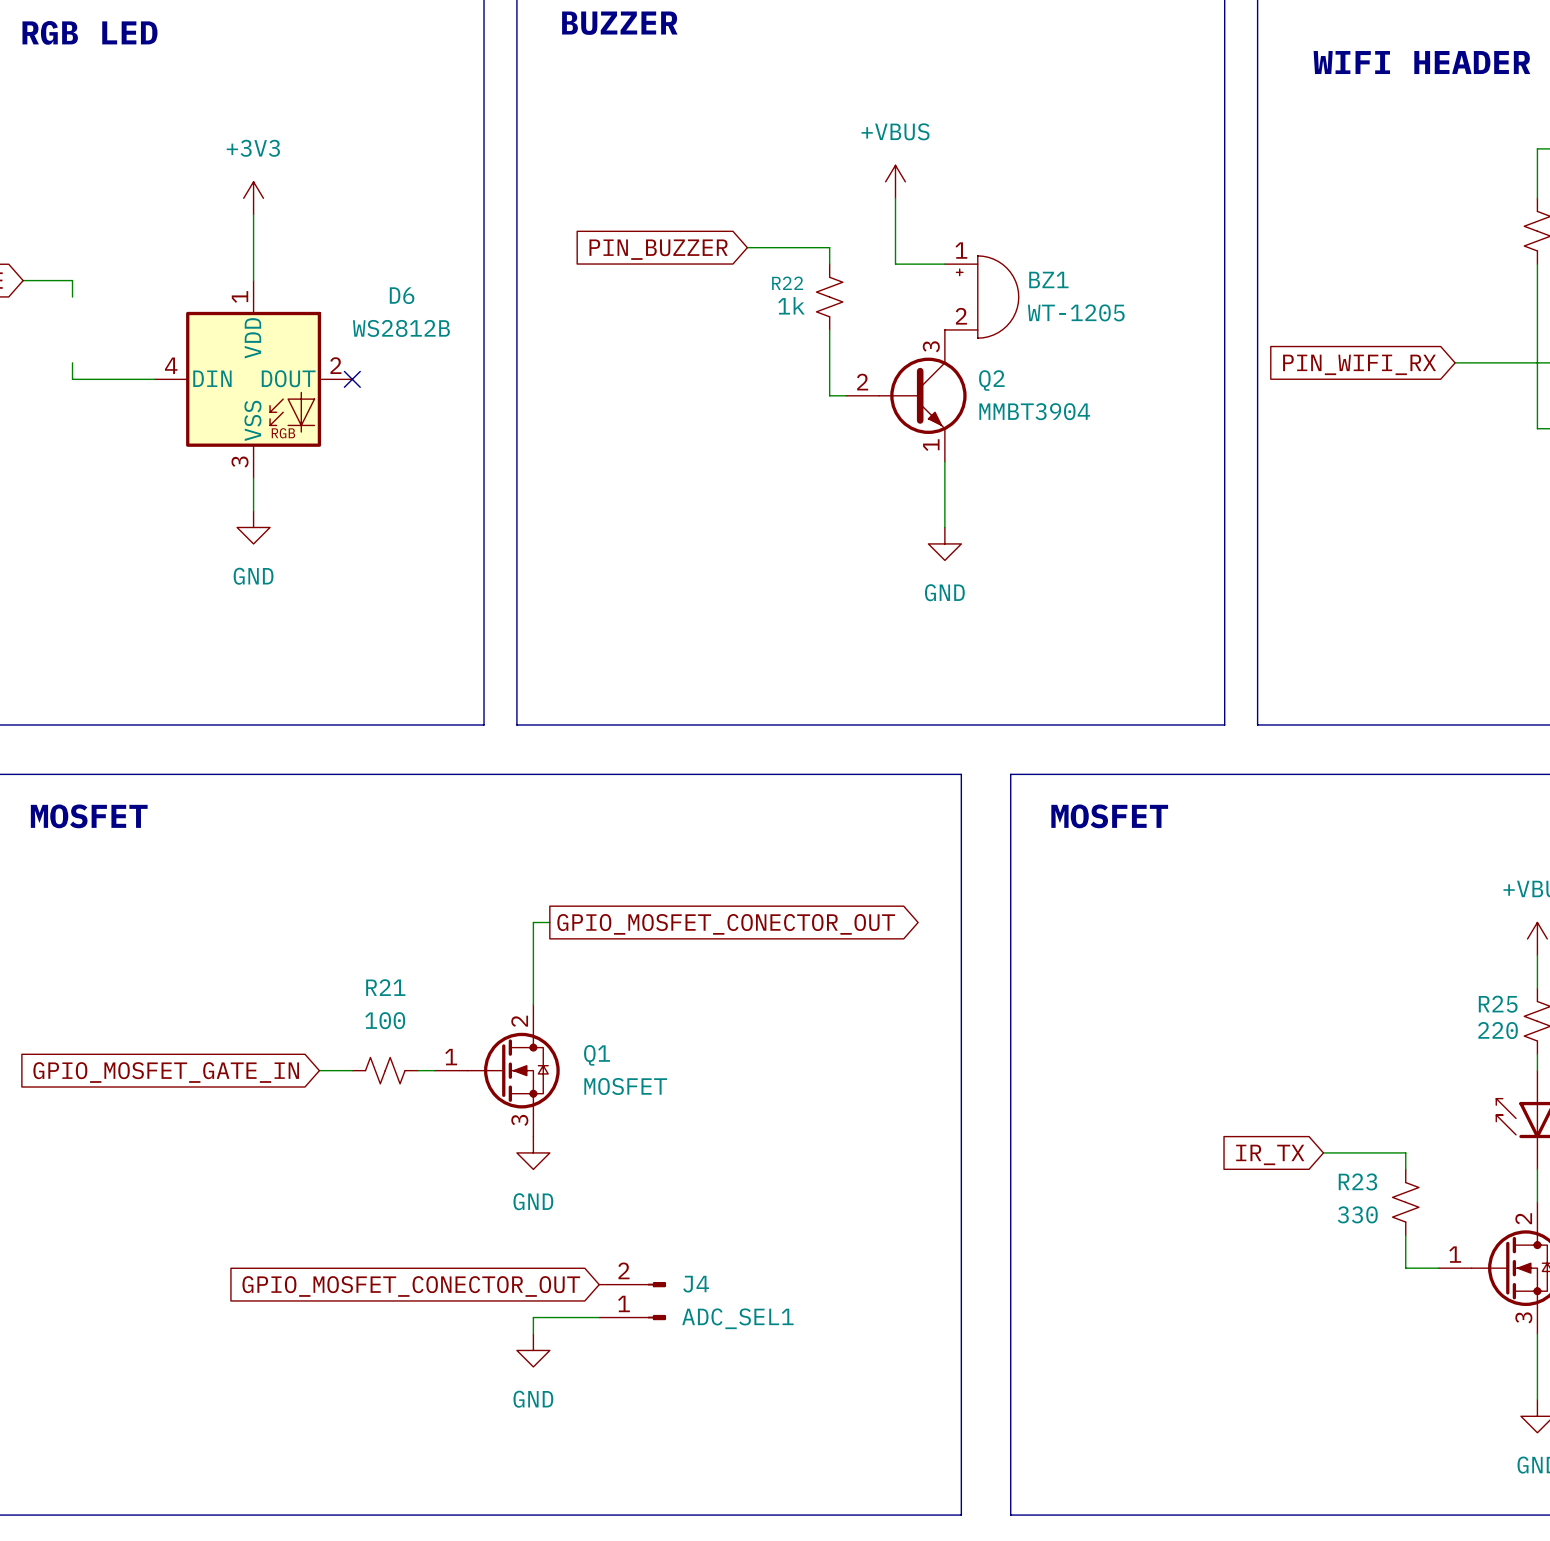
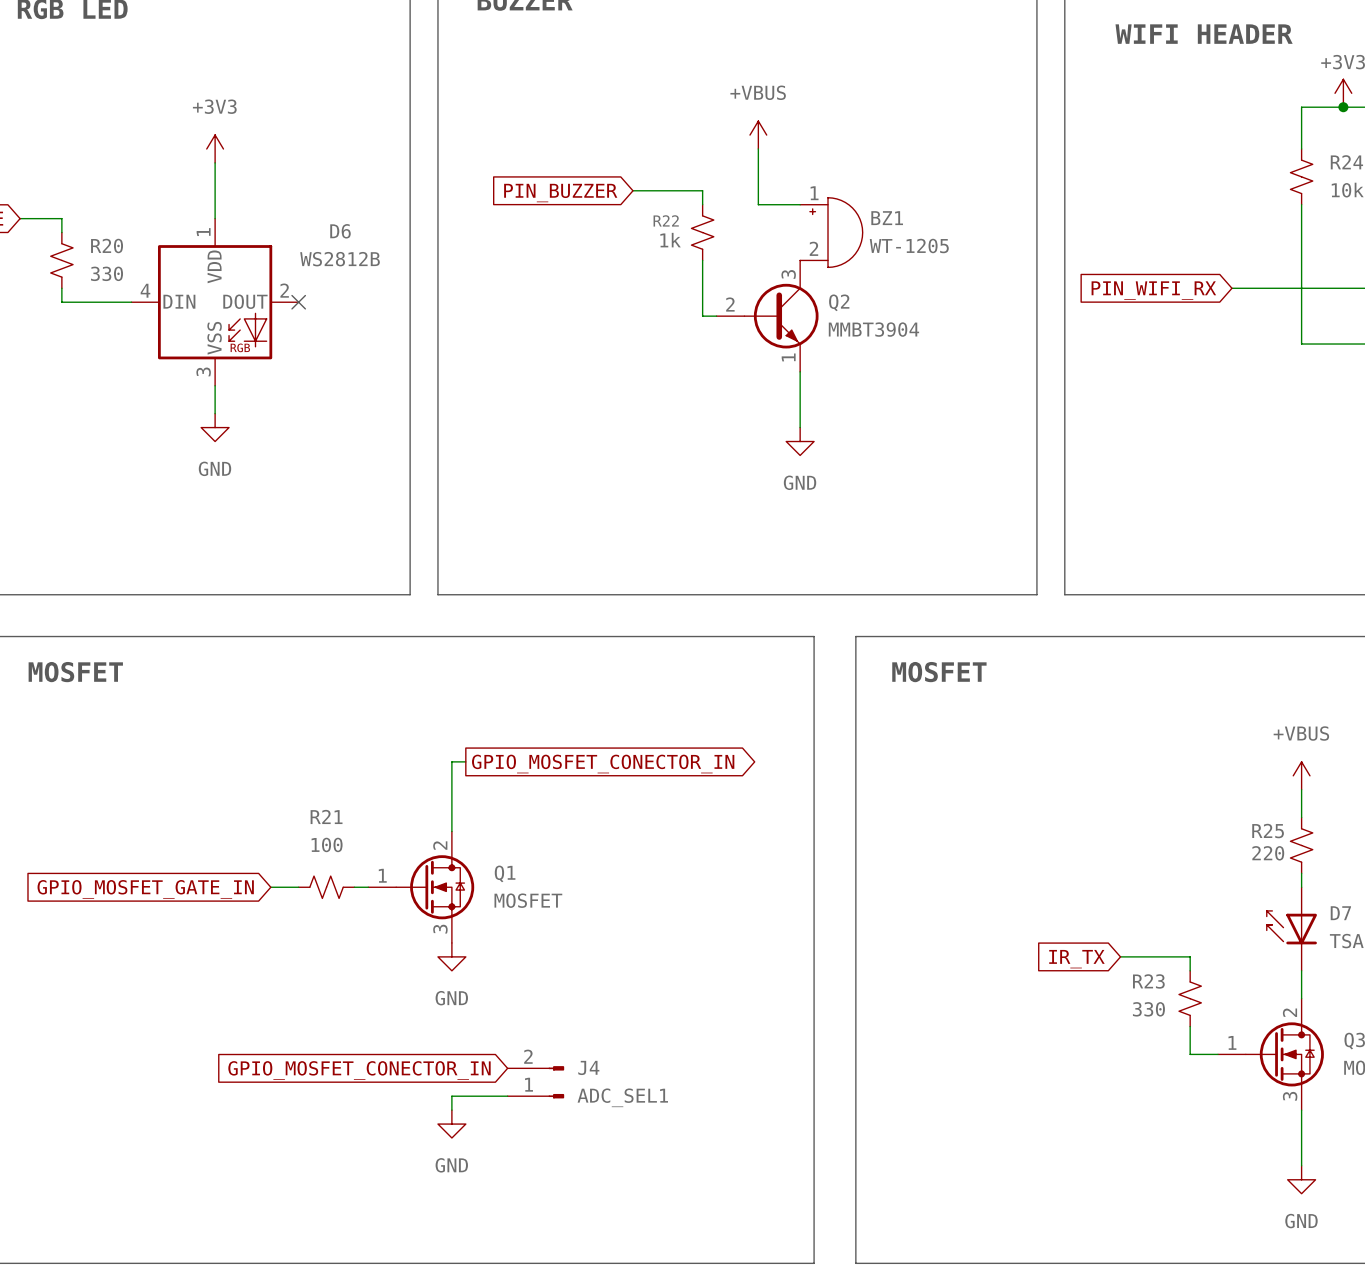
R20: none -> 330 (61, 260)
global label: GPIO_MOSFET_CONECTOR_OUT (726, 924) -> GPIO_MOSFET_CONECTOR_IN (603, 764)
global label: GPIO_MOSFET_CONECTOR_OUT (411, 1286) -> GPIO_MOSFET_CONECTOR_IN (359, 1070)

